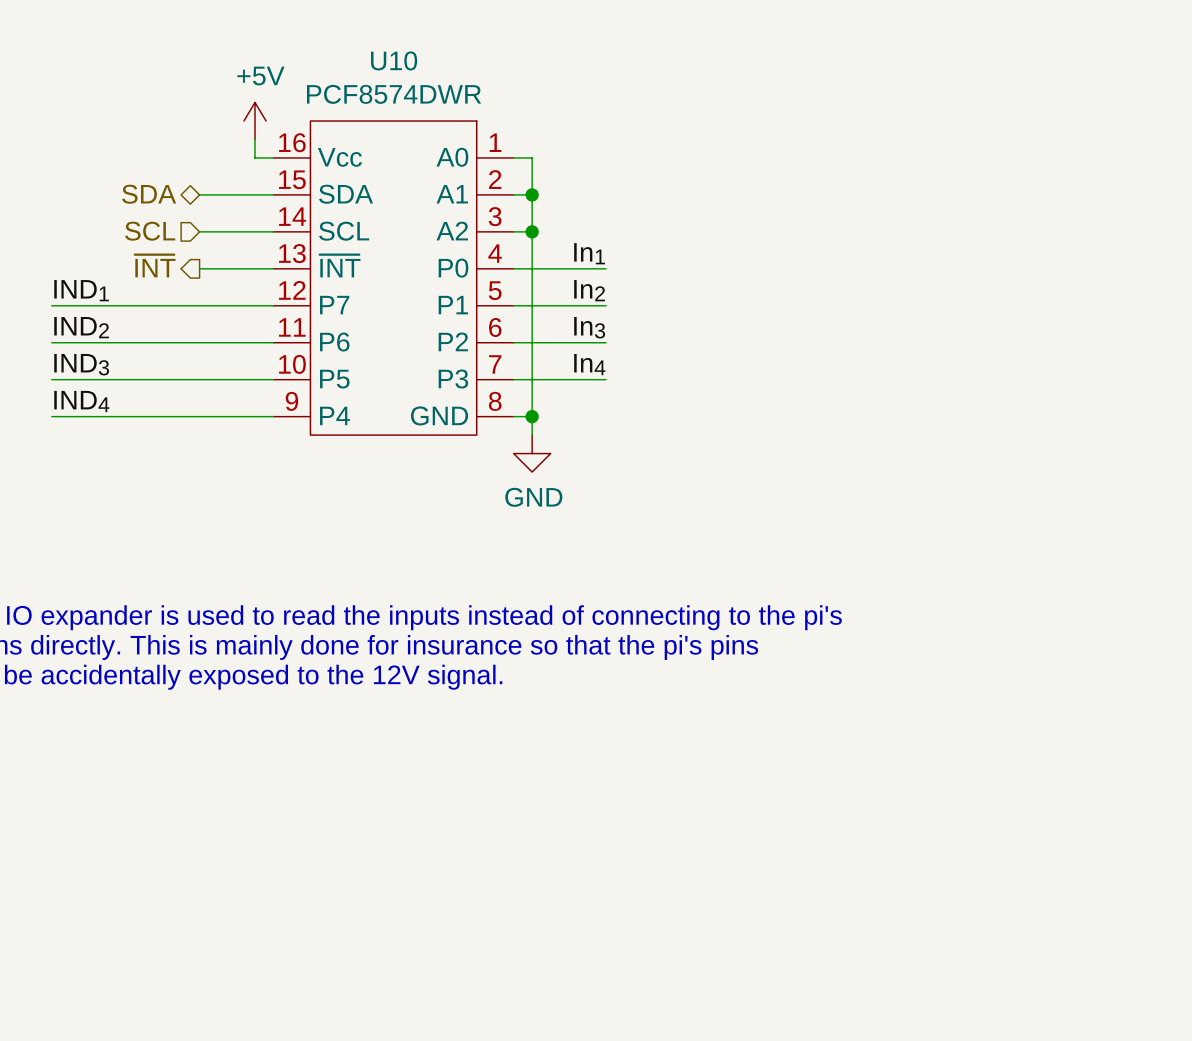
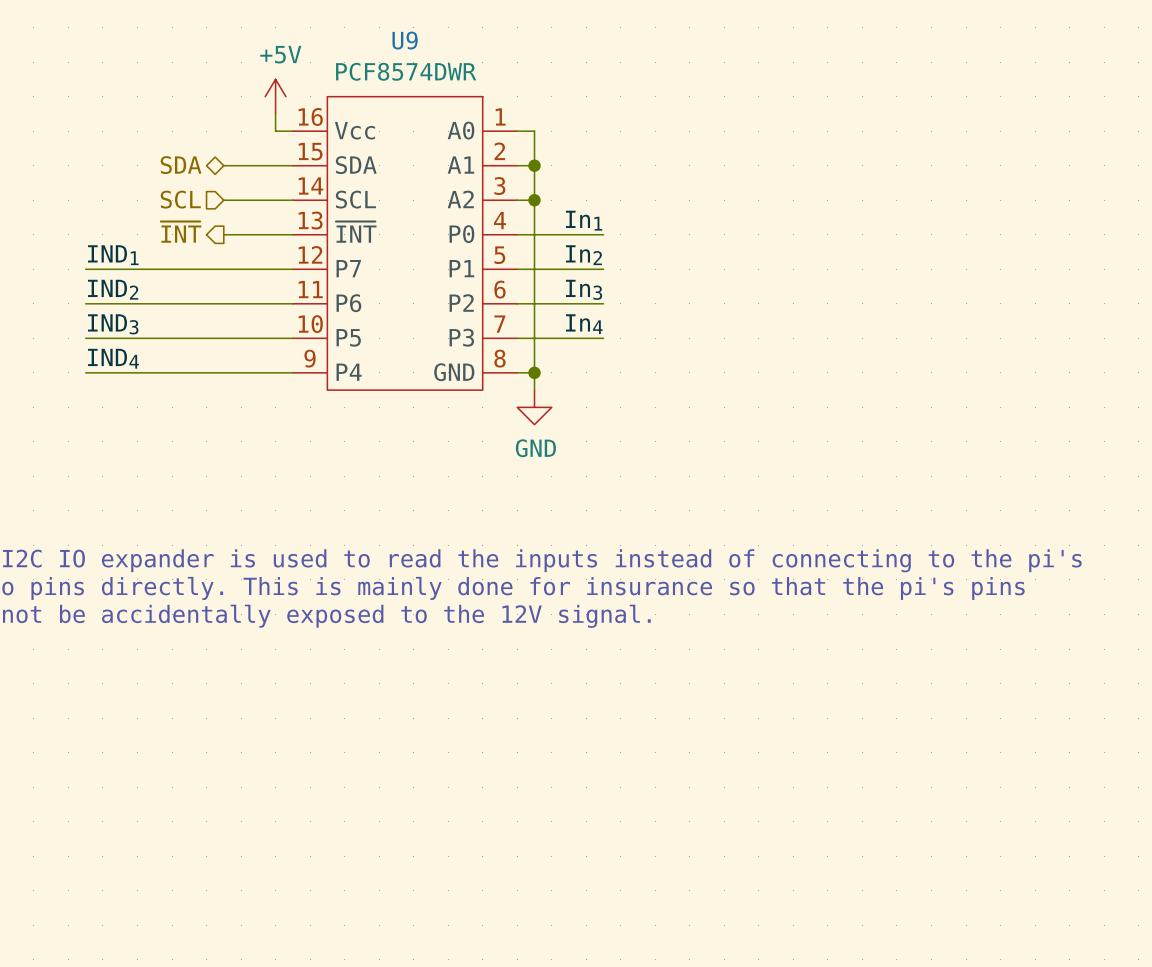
U10 name: U10 (394, 60) -> U9 (405, 40)

